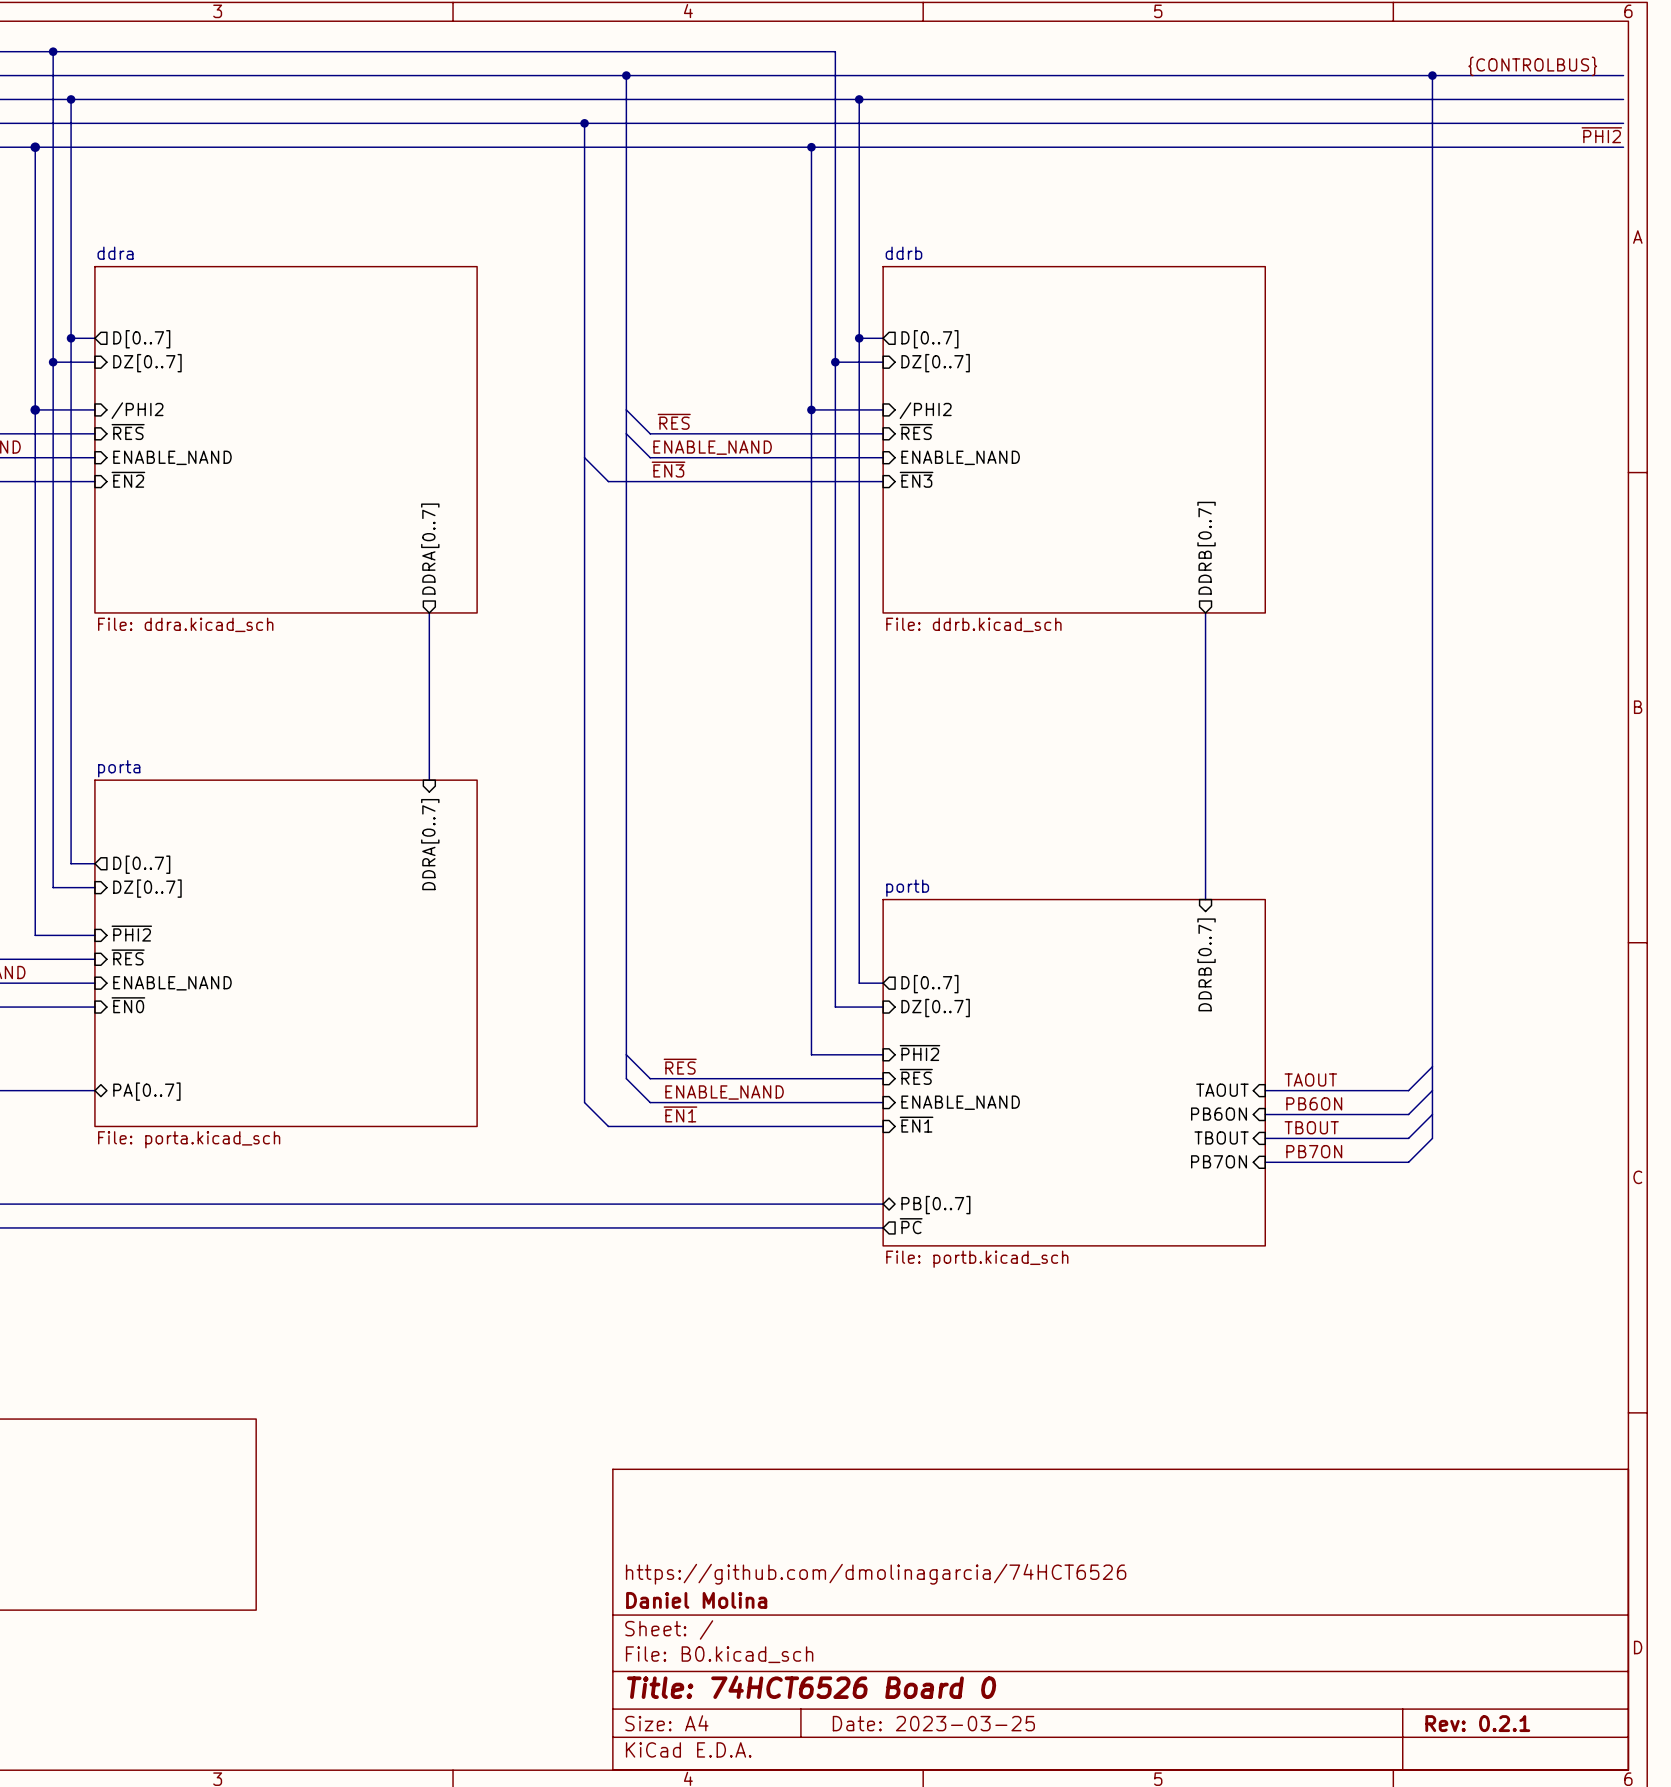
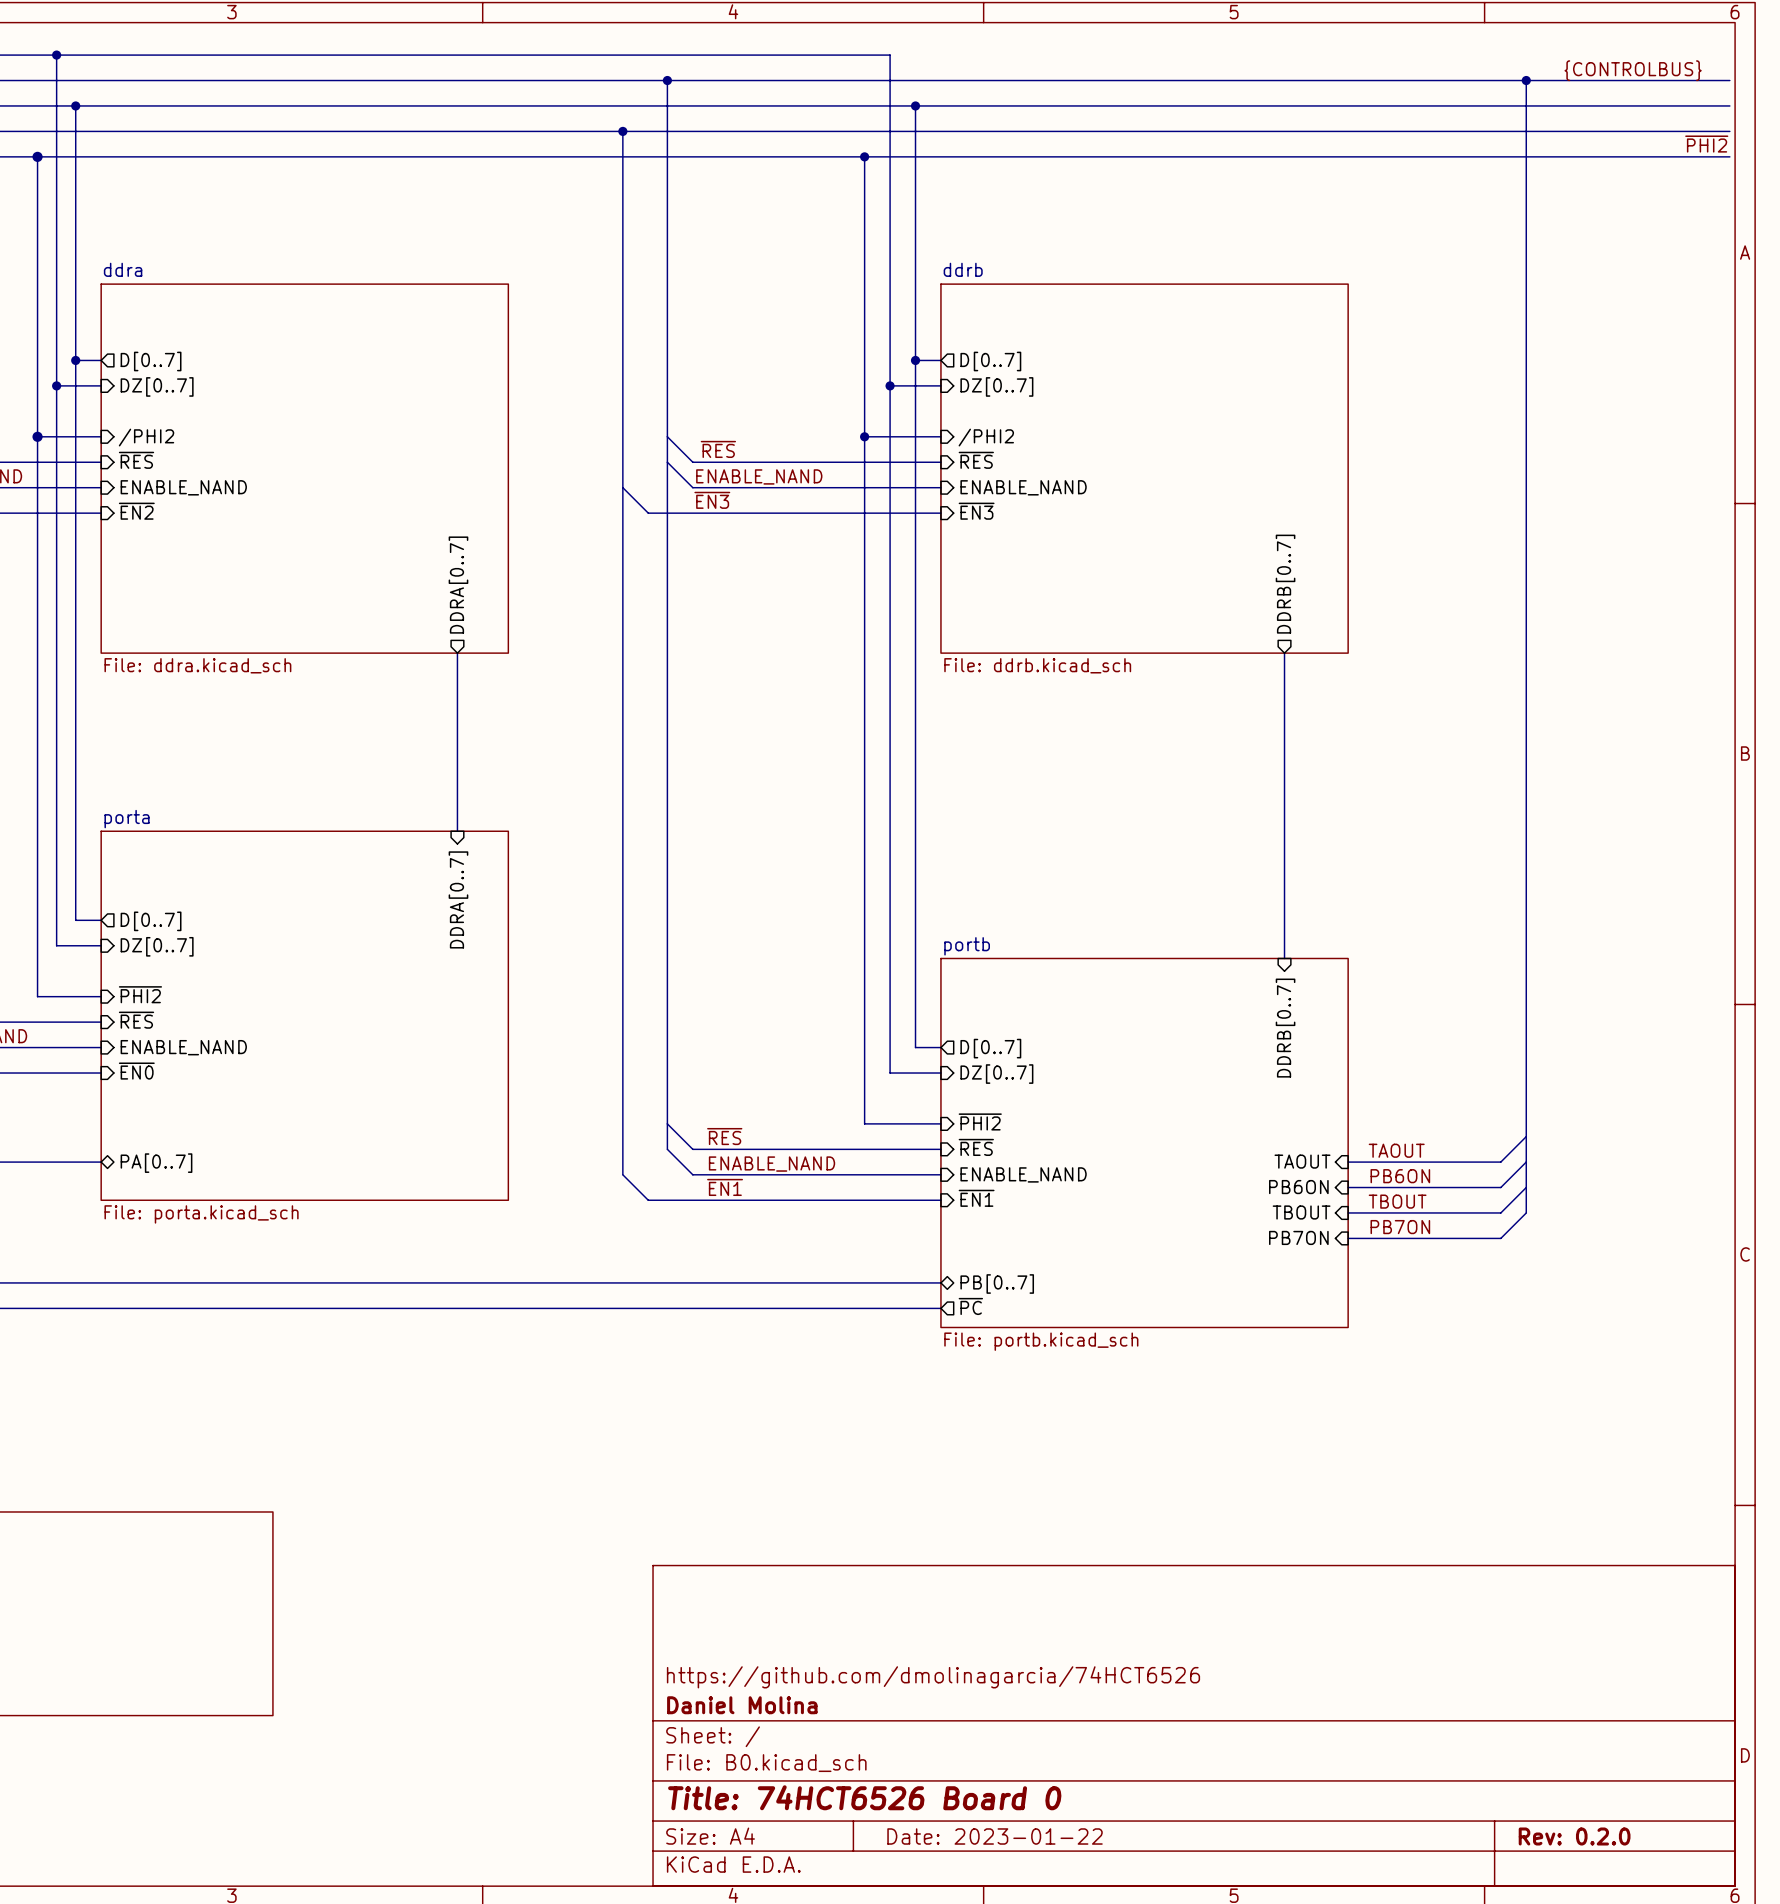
title block: Date: 2023-03-25 (933, 1723) -> Date: 2023-01-22 (995, 1836)
title block: Rev: 0.2.1 (1477, 1723) -> Rev: 0.2.0 (1574, 1836)

